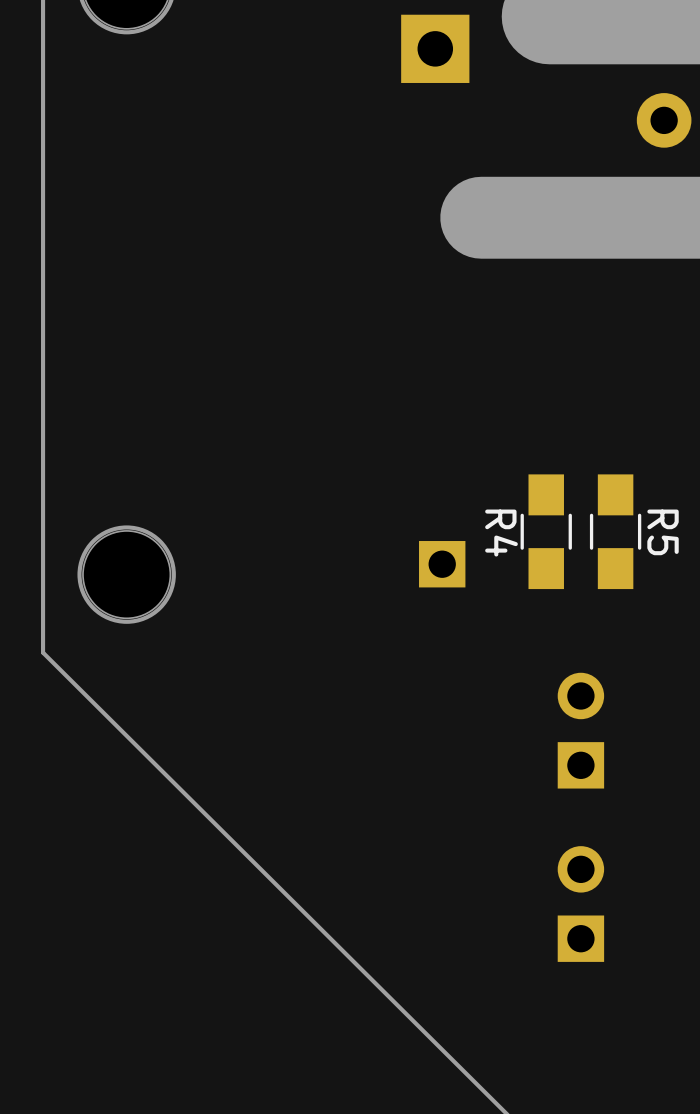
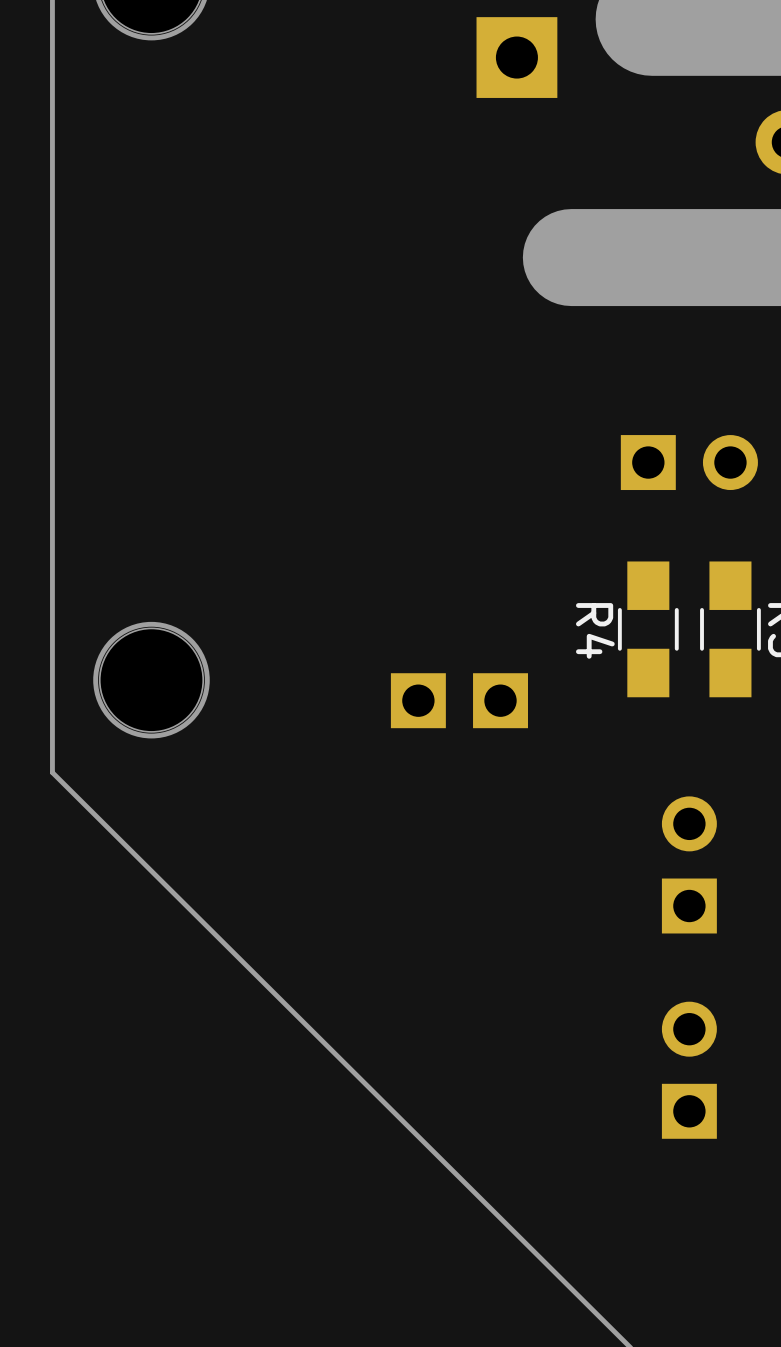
part: none -> (689, 462)
part position: (442, 564) -> (500, 700)
part: none -> (418, 700)

